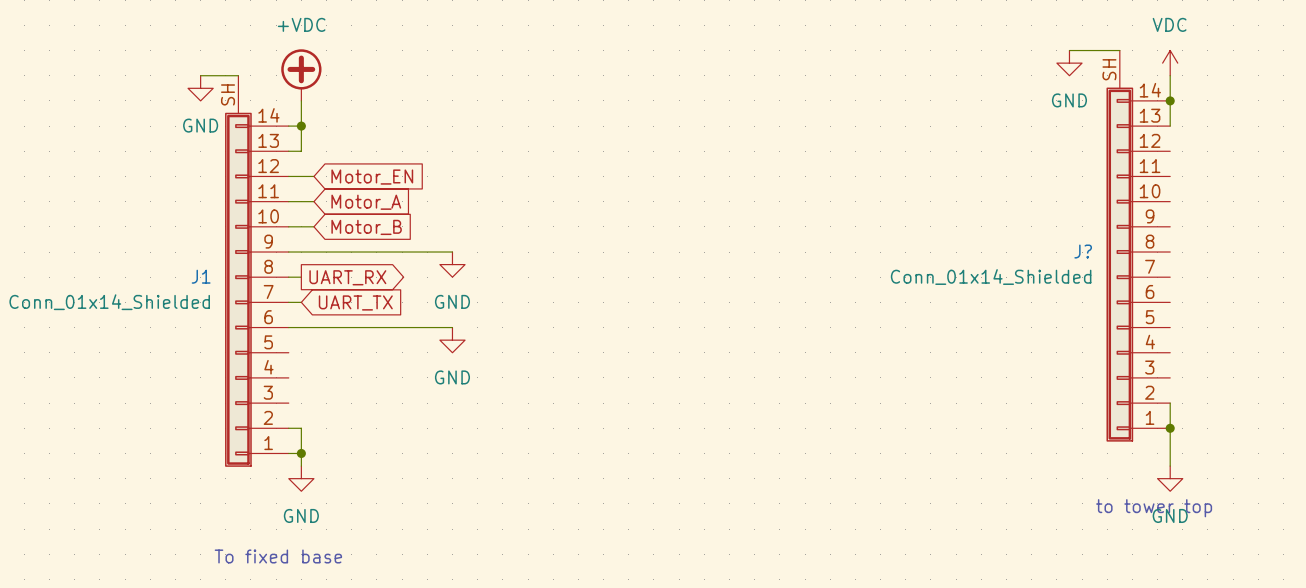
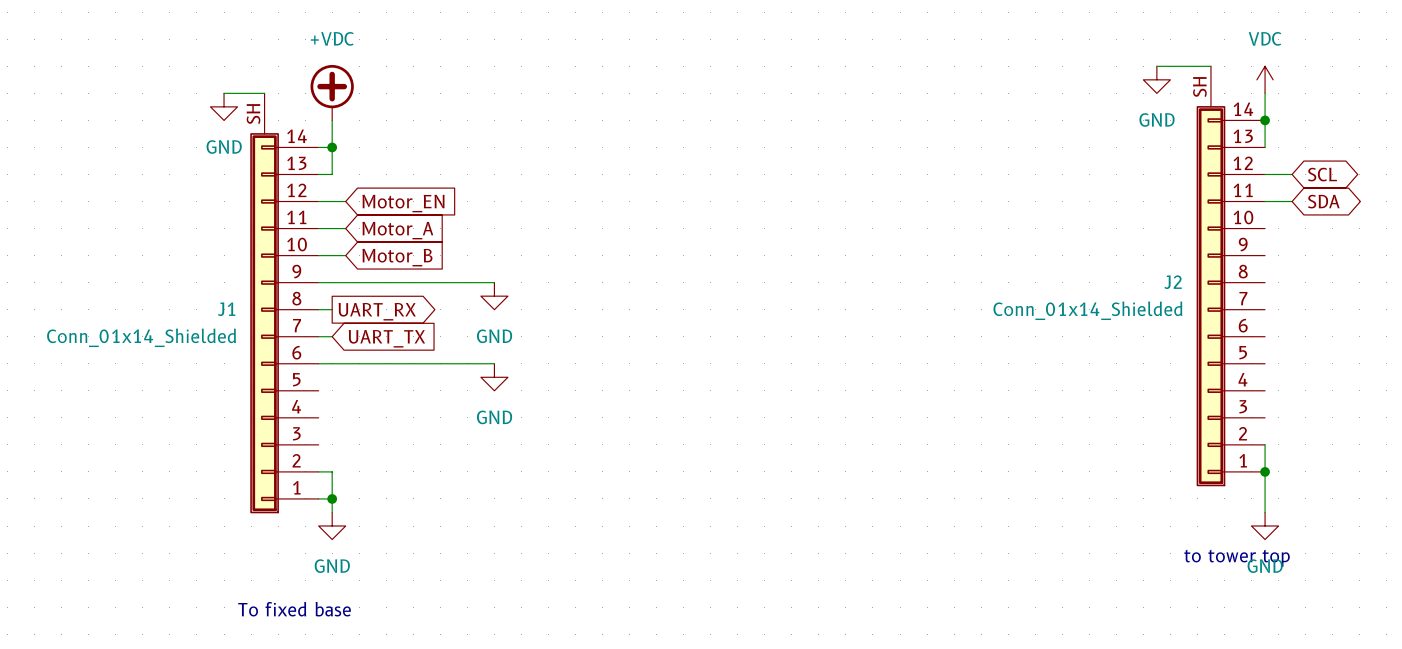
wire: none -> (1265, 174) (1292, 174)
global label: none -> SCL (1322, 174)
wire: none -> (1265, 201) (1292, 201)
global label: none -> SDA (1323, 201)
J? name: J? (1083, 251) -> J2 (1173, 282)

